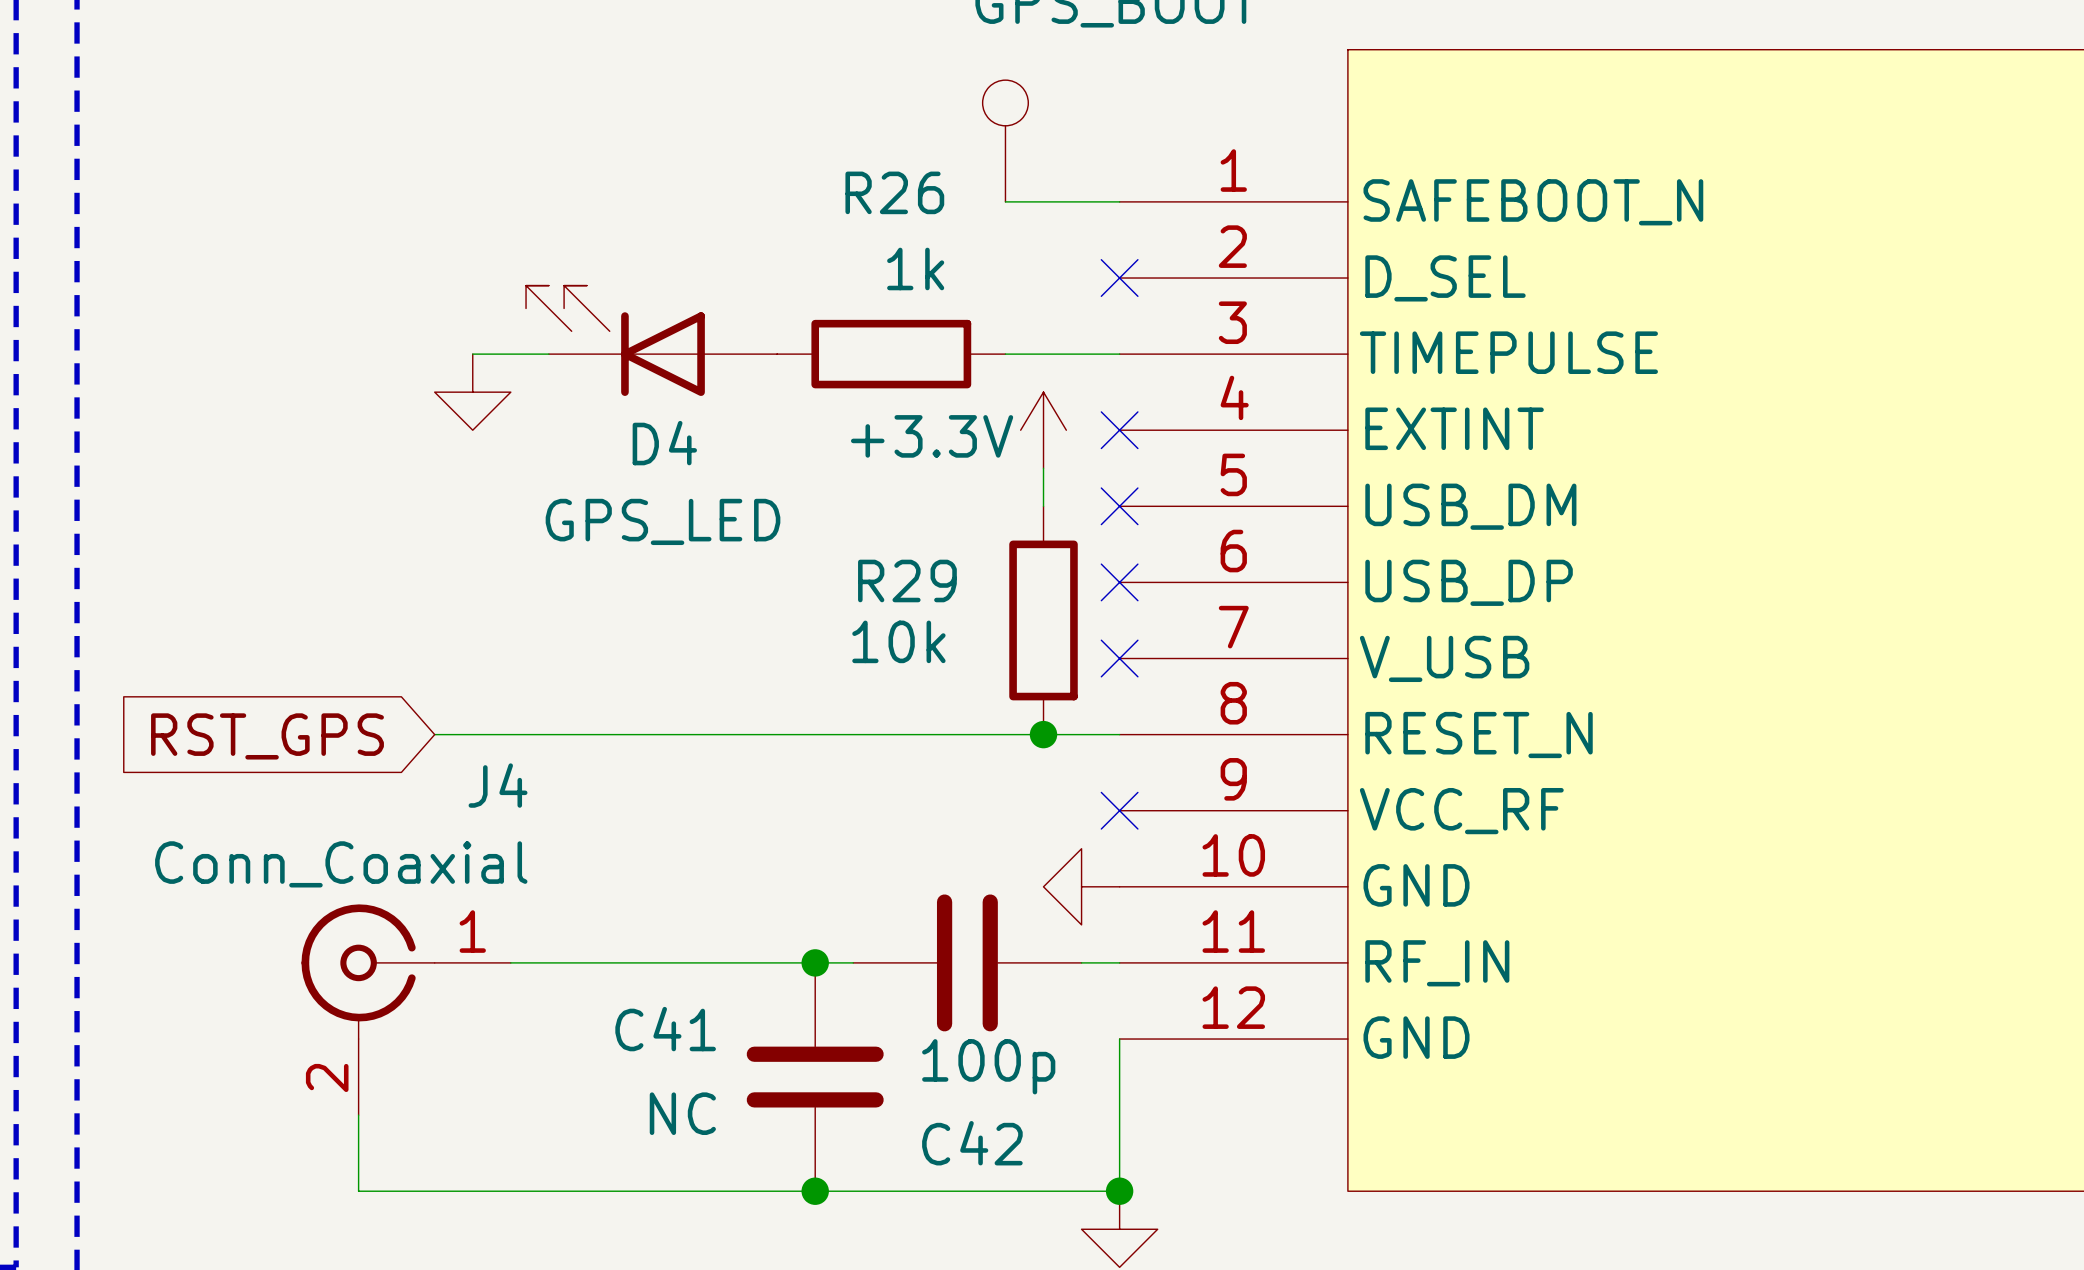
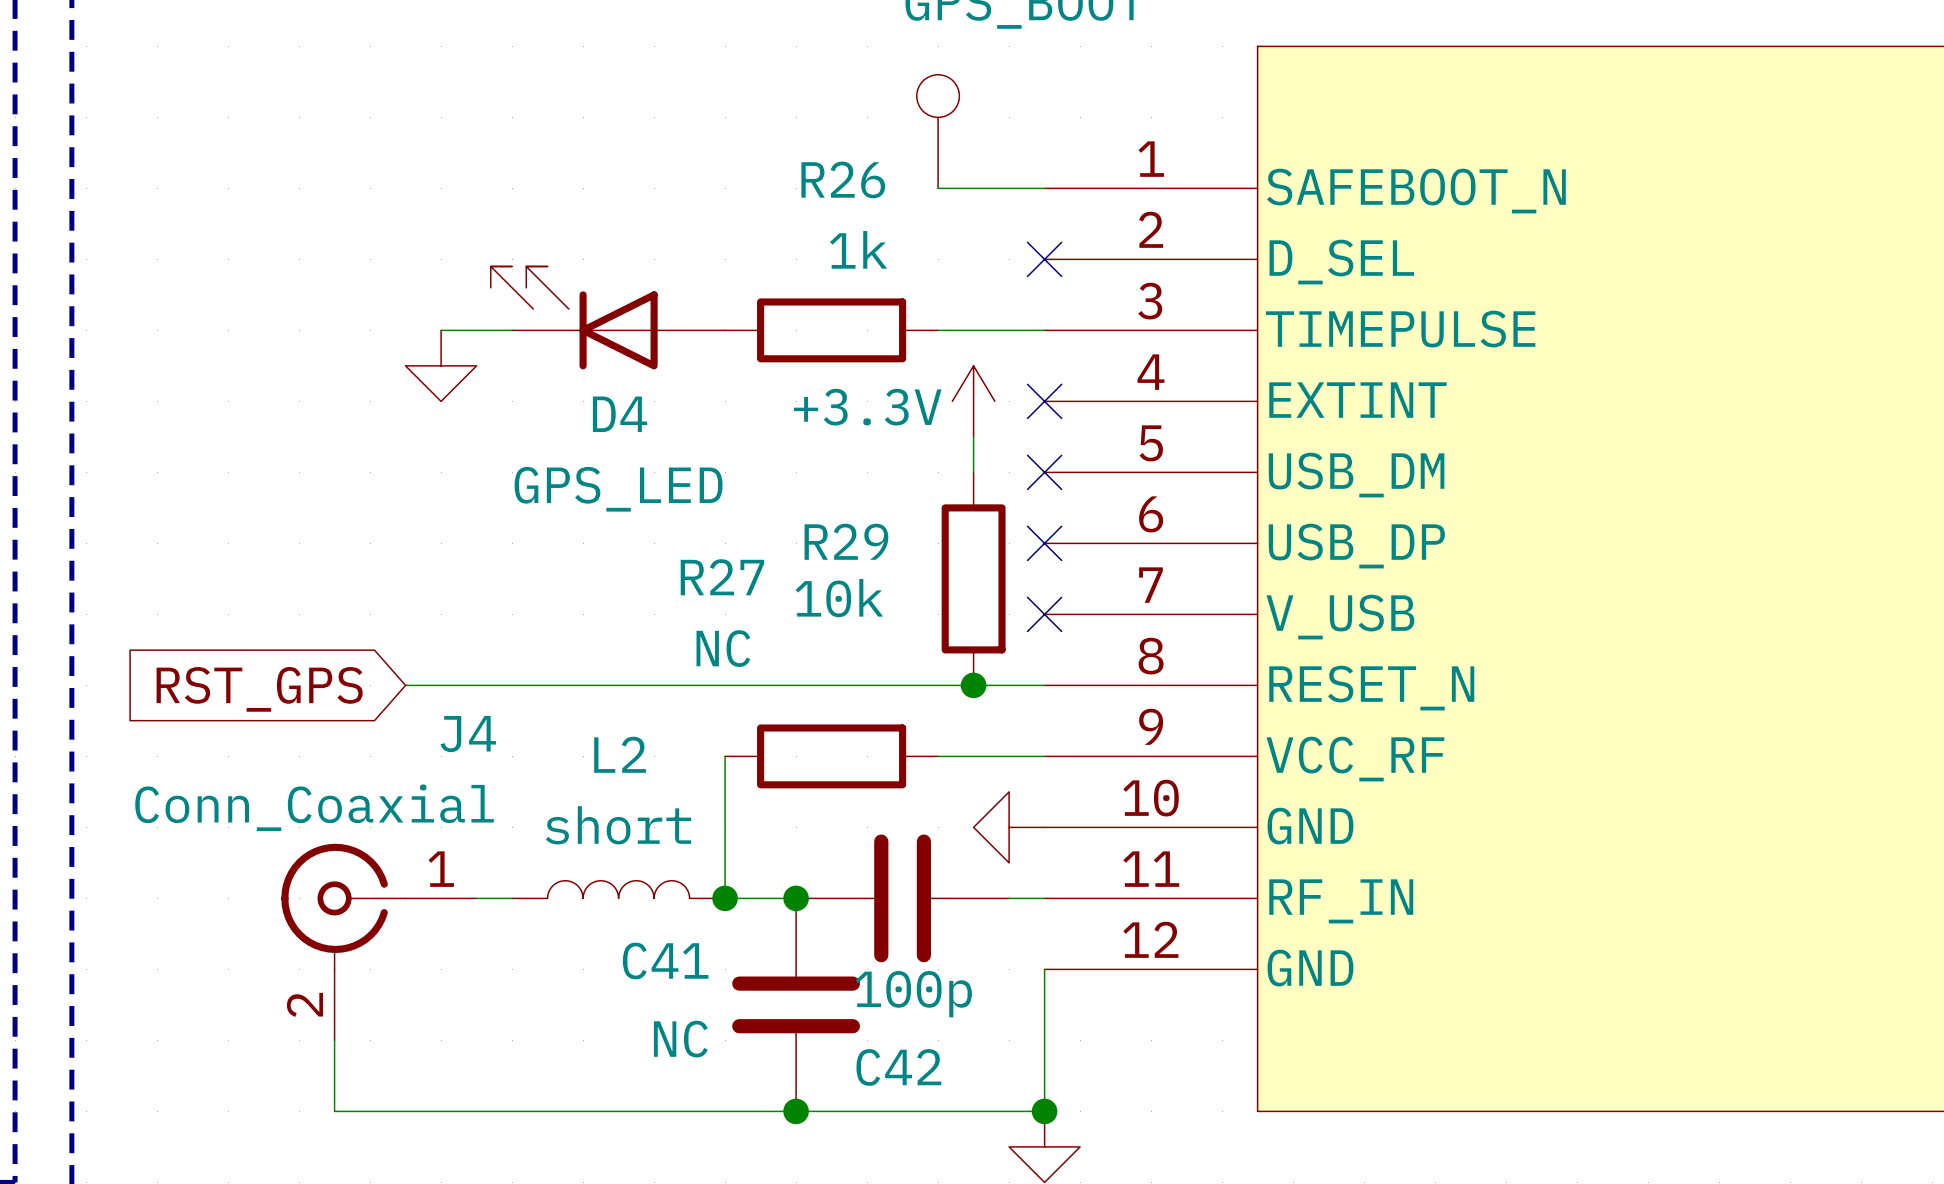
R27: none -> NC (831, 756)
wire: none -> (938, 756) (1044, 756)
no-connect mark: (1119, 810) -> none
L2: none -> short (618, 889)
wire: (548, 962) (777, 962) -> (725, 756) (725, 898)
junction: none -> (725, 898)
junction: (815, 962) -> none
junction: none -> (796, 898)
C41 position: (815, 1077) -> (796, 1004)
junction position: (815, 1191) -> (796, 1111)

